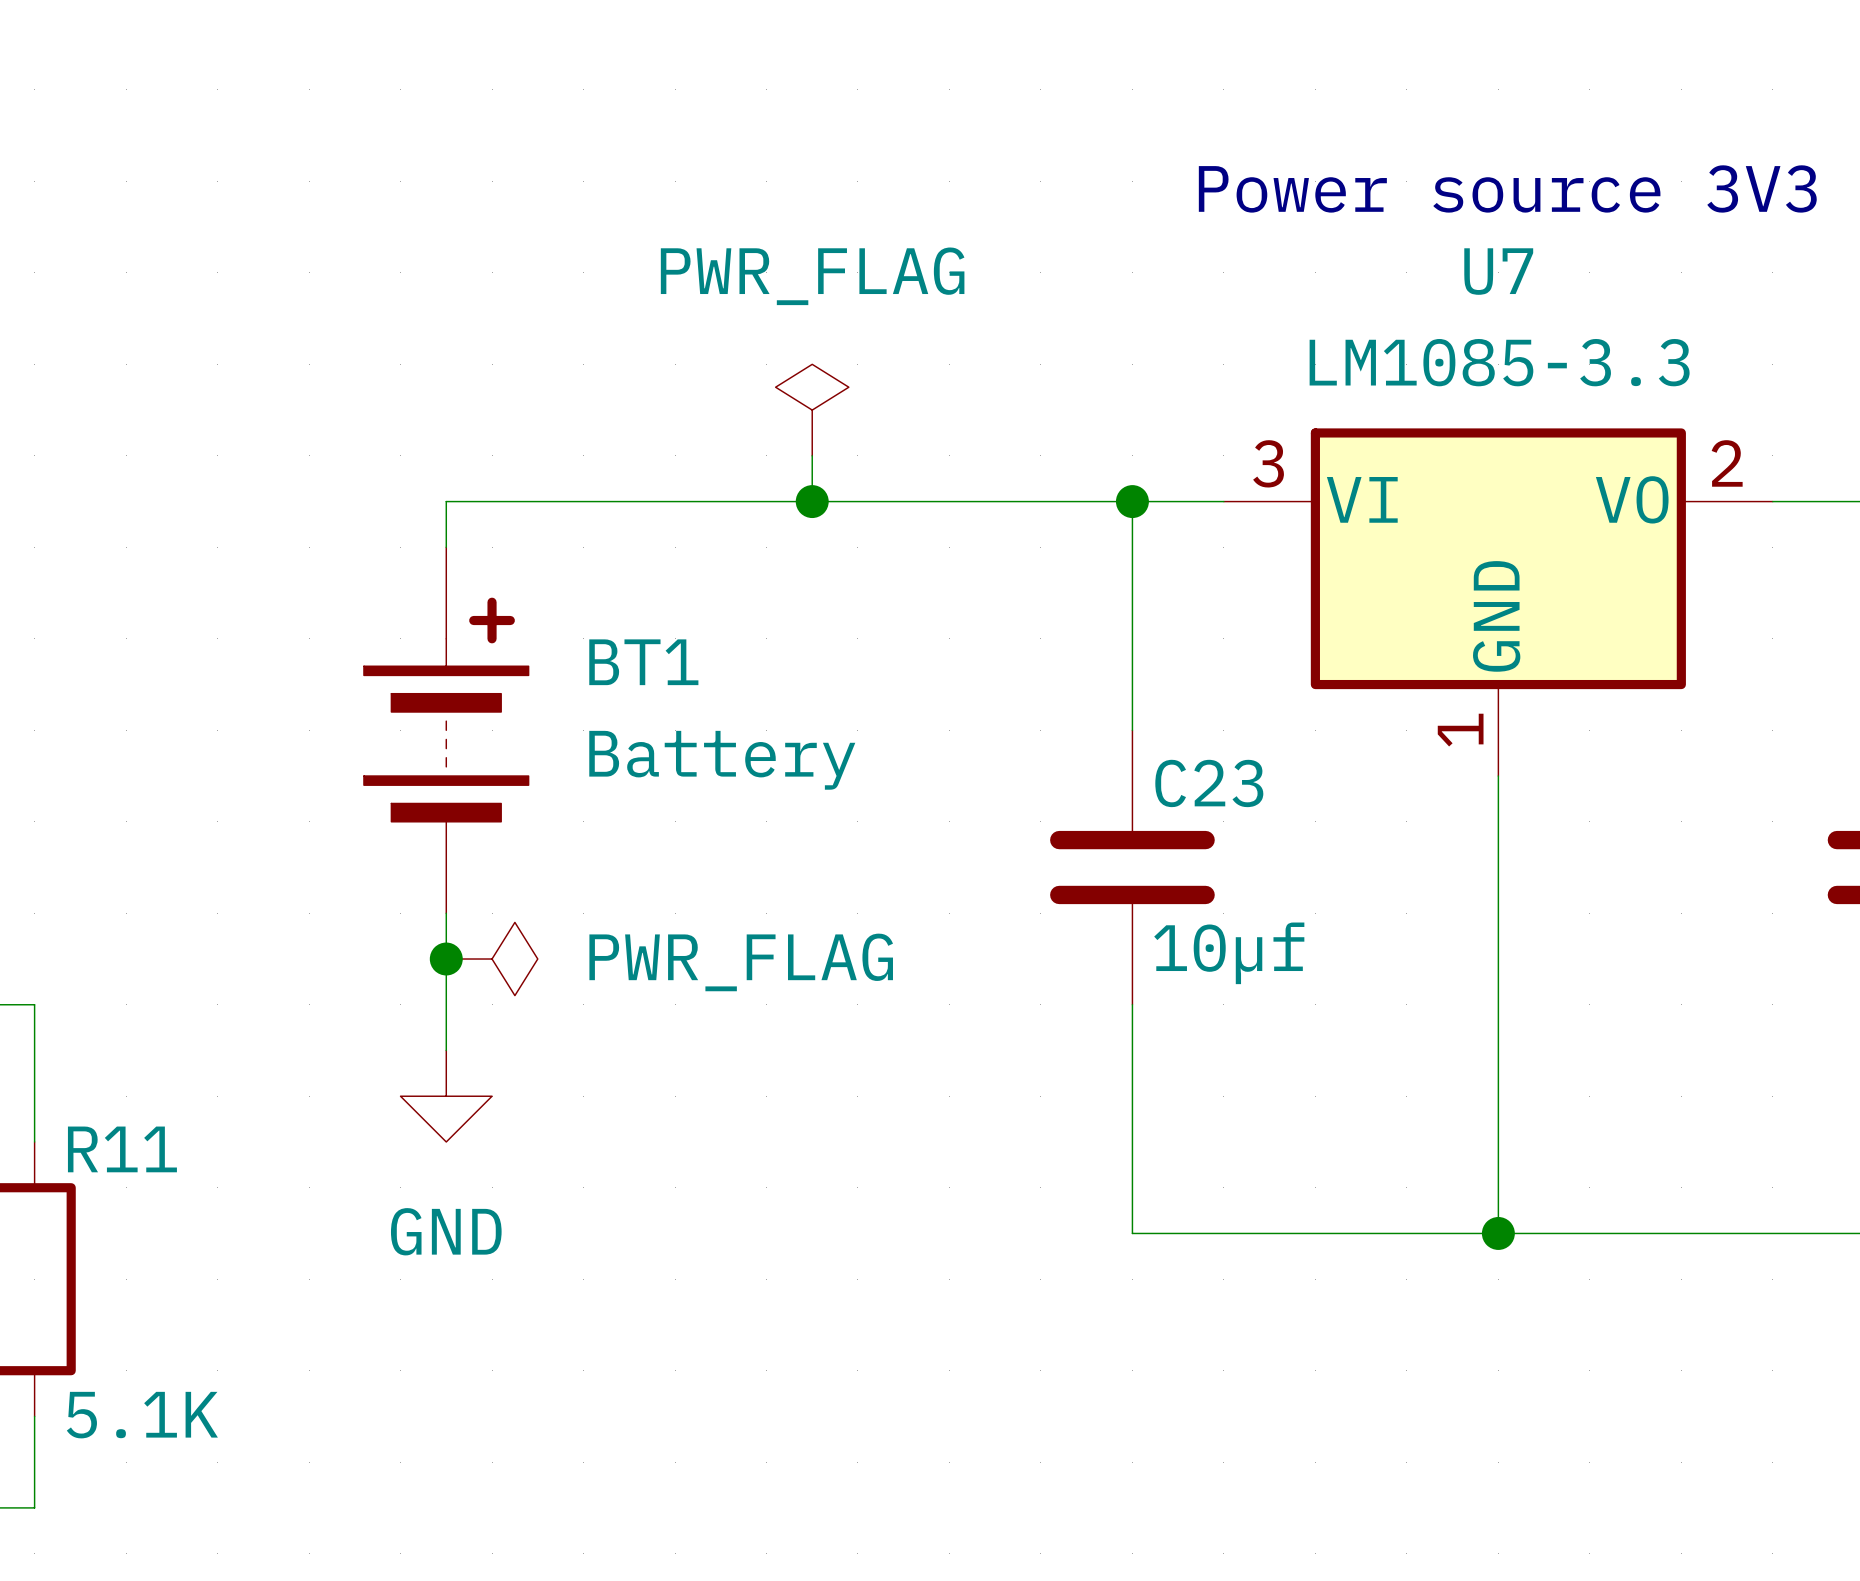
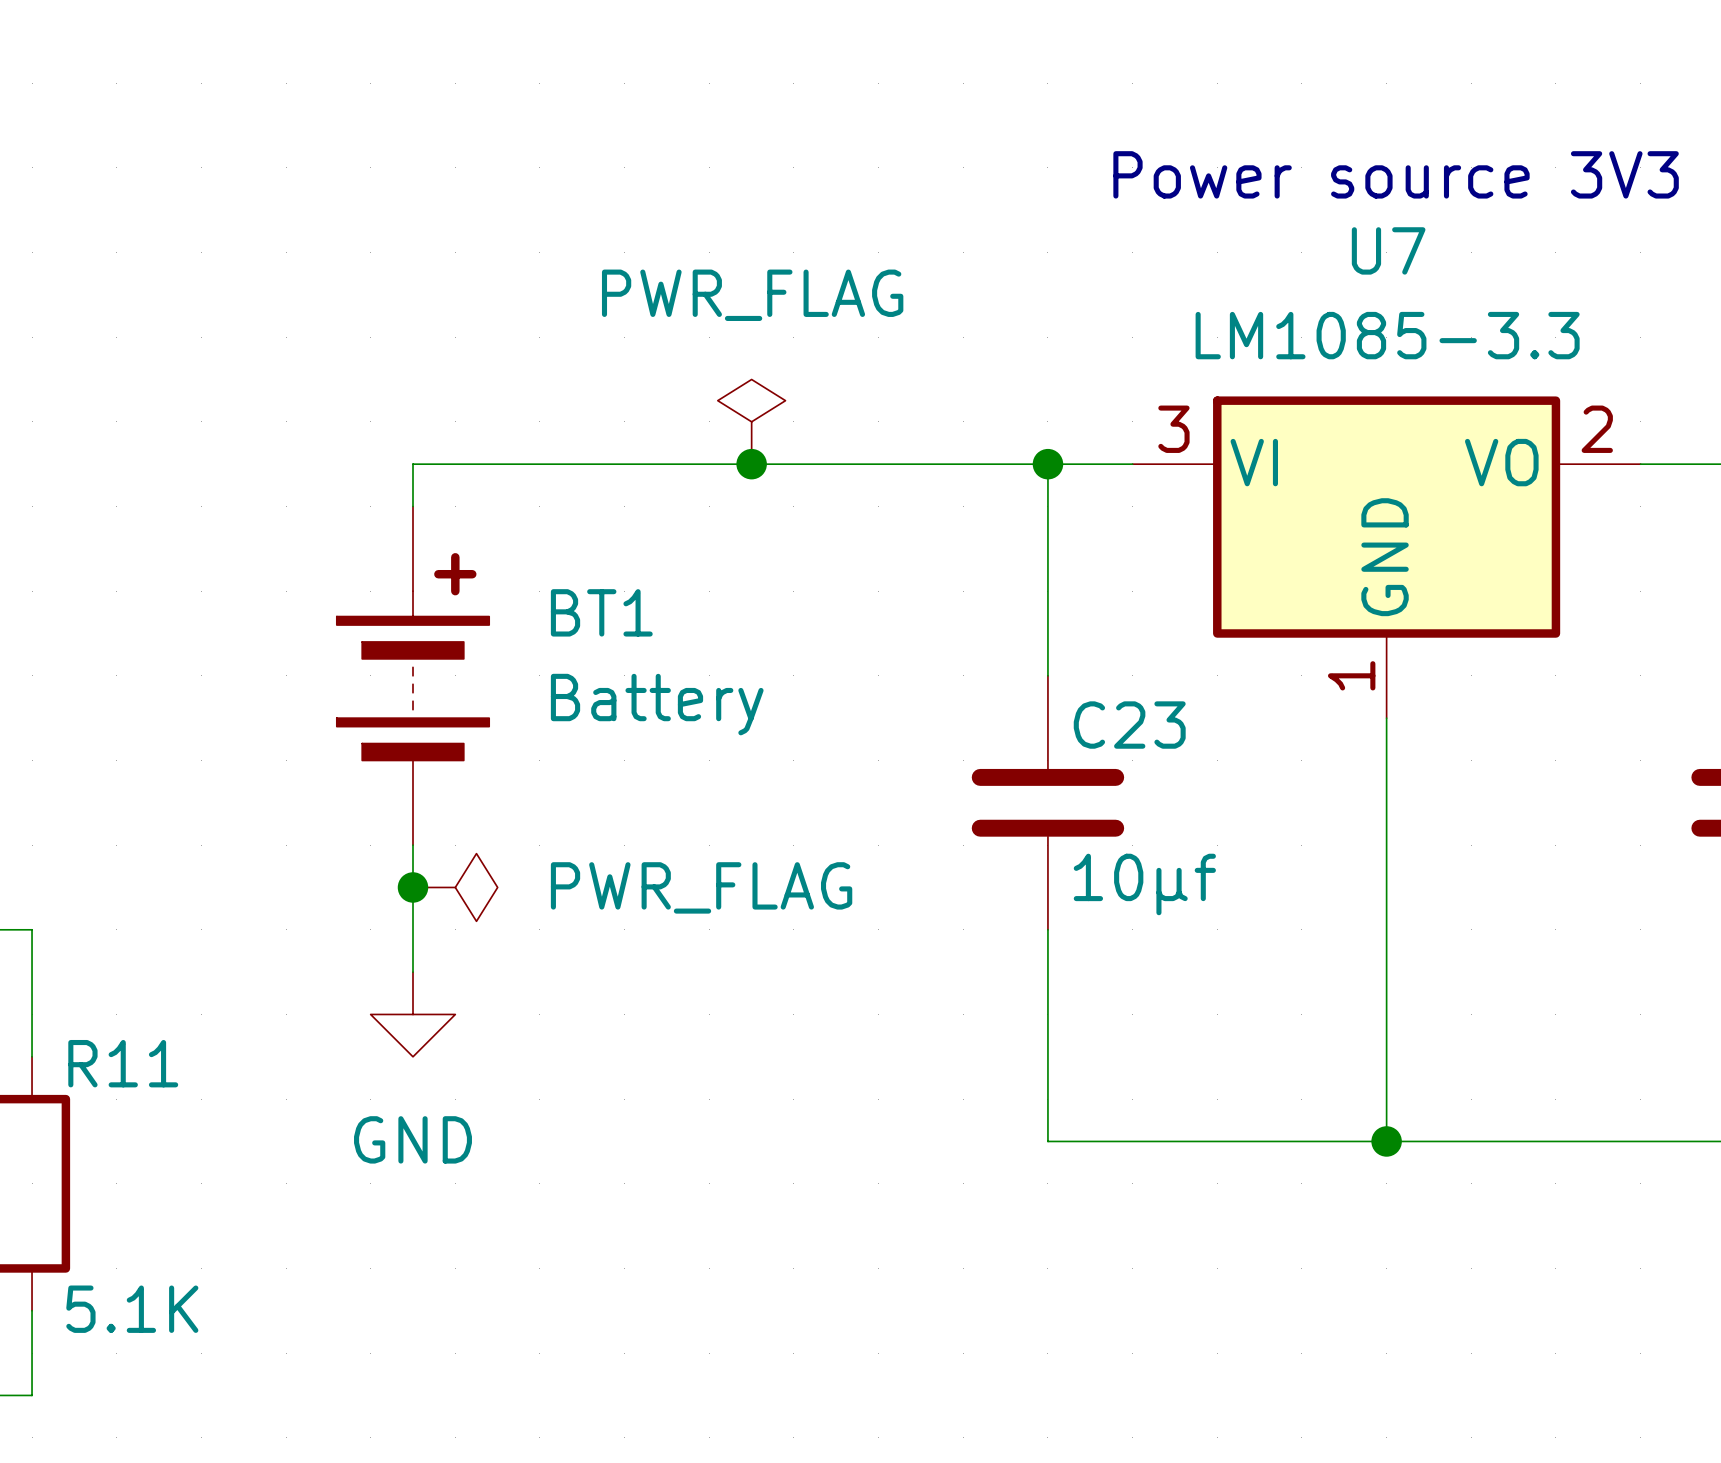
power symbol position: PWR_FLAG (812, 410) -> PWR_FLAG (751, 421)

